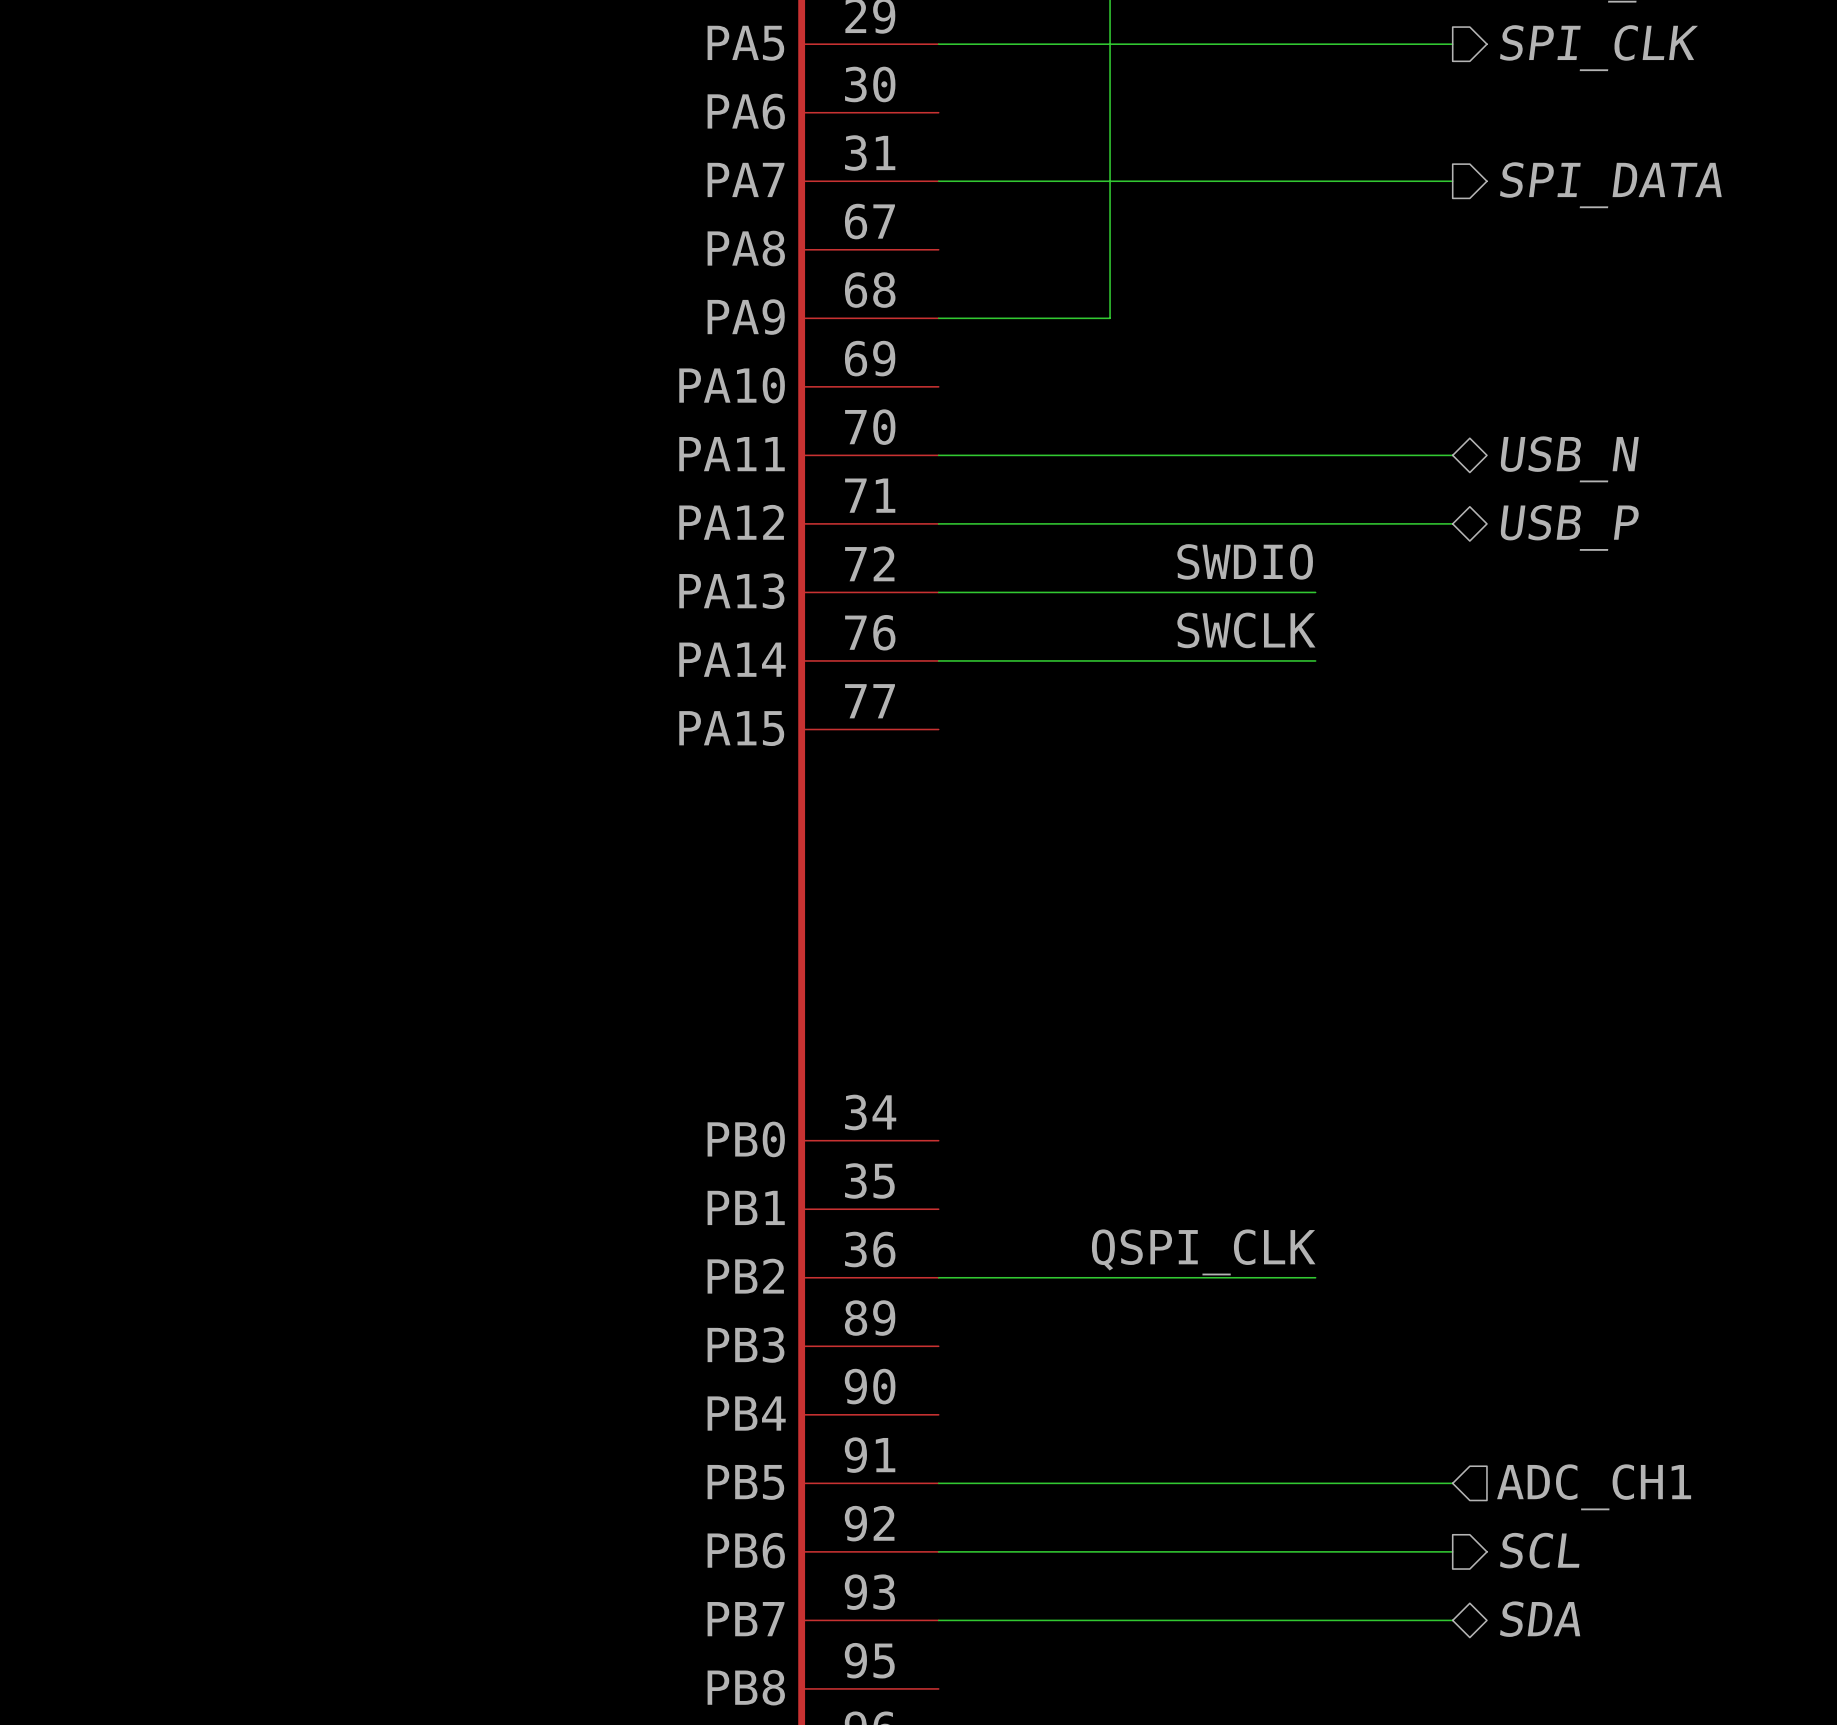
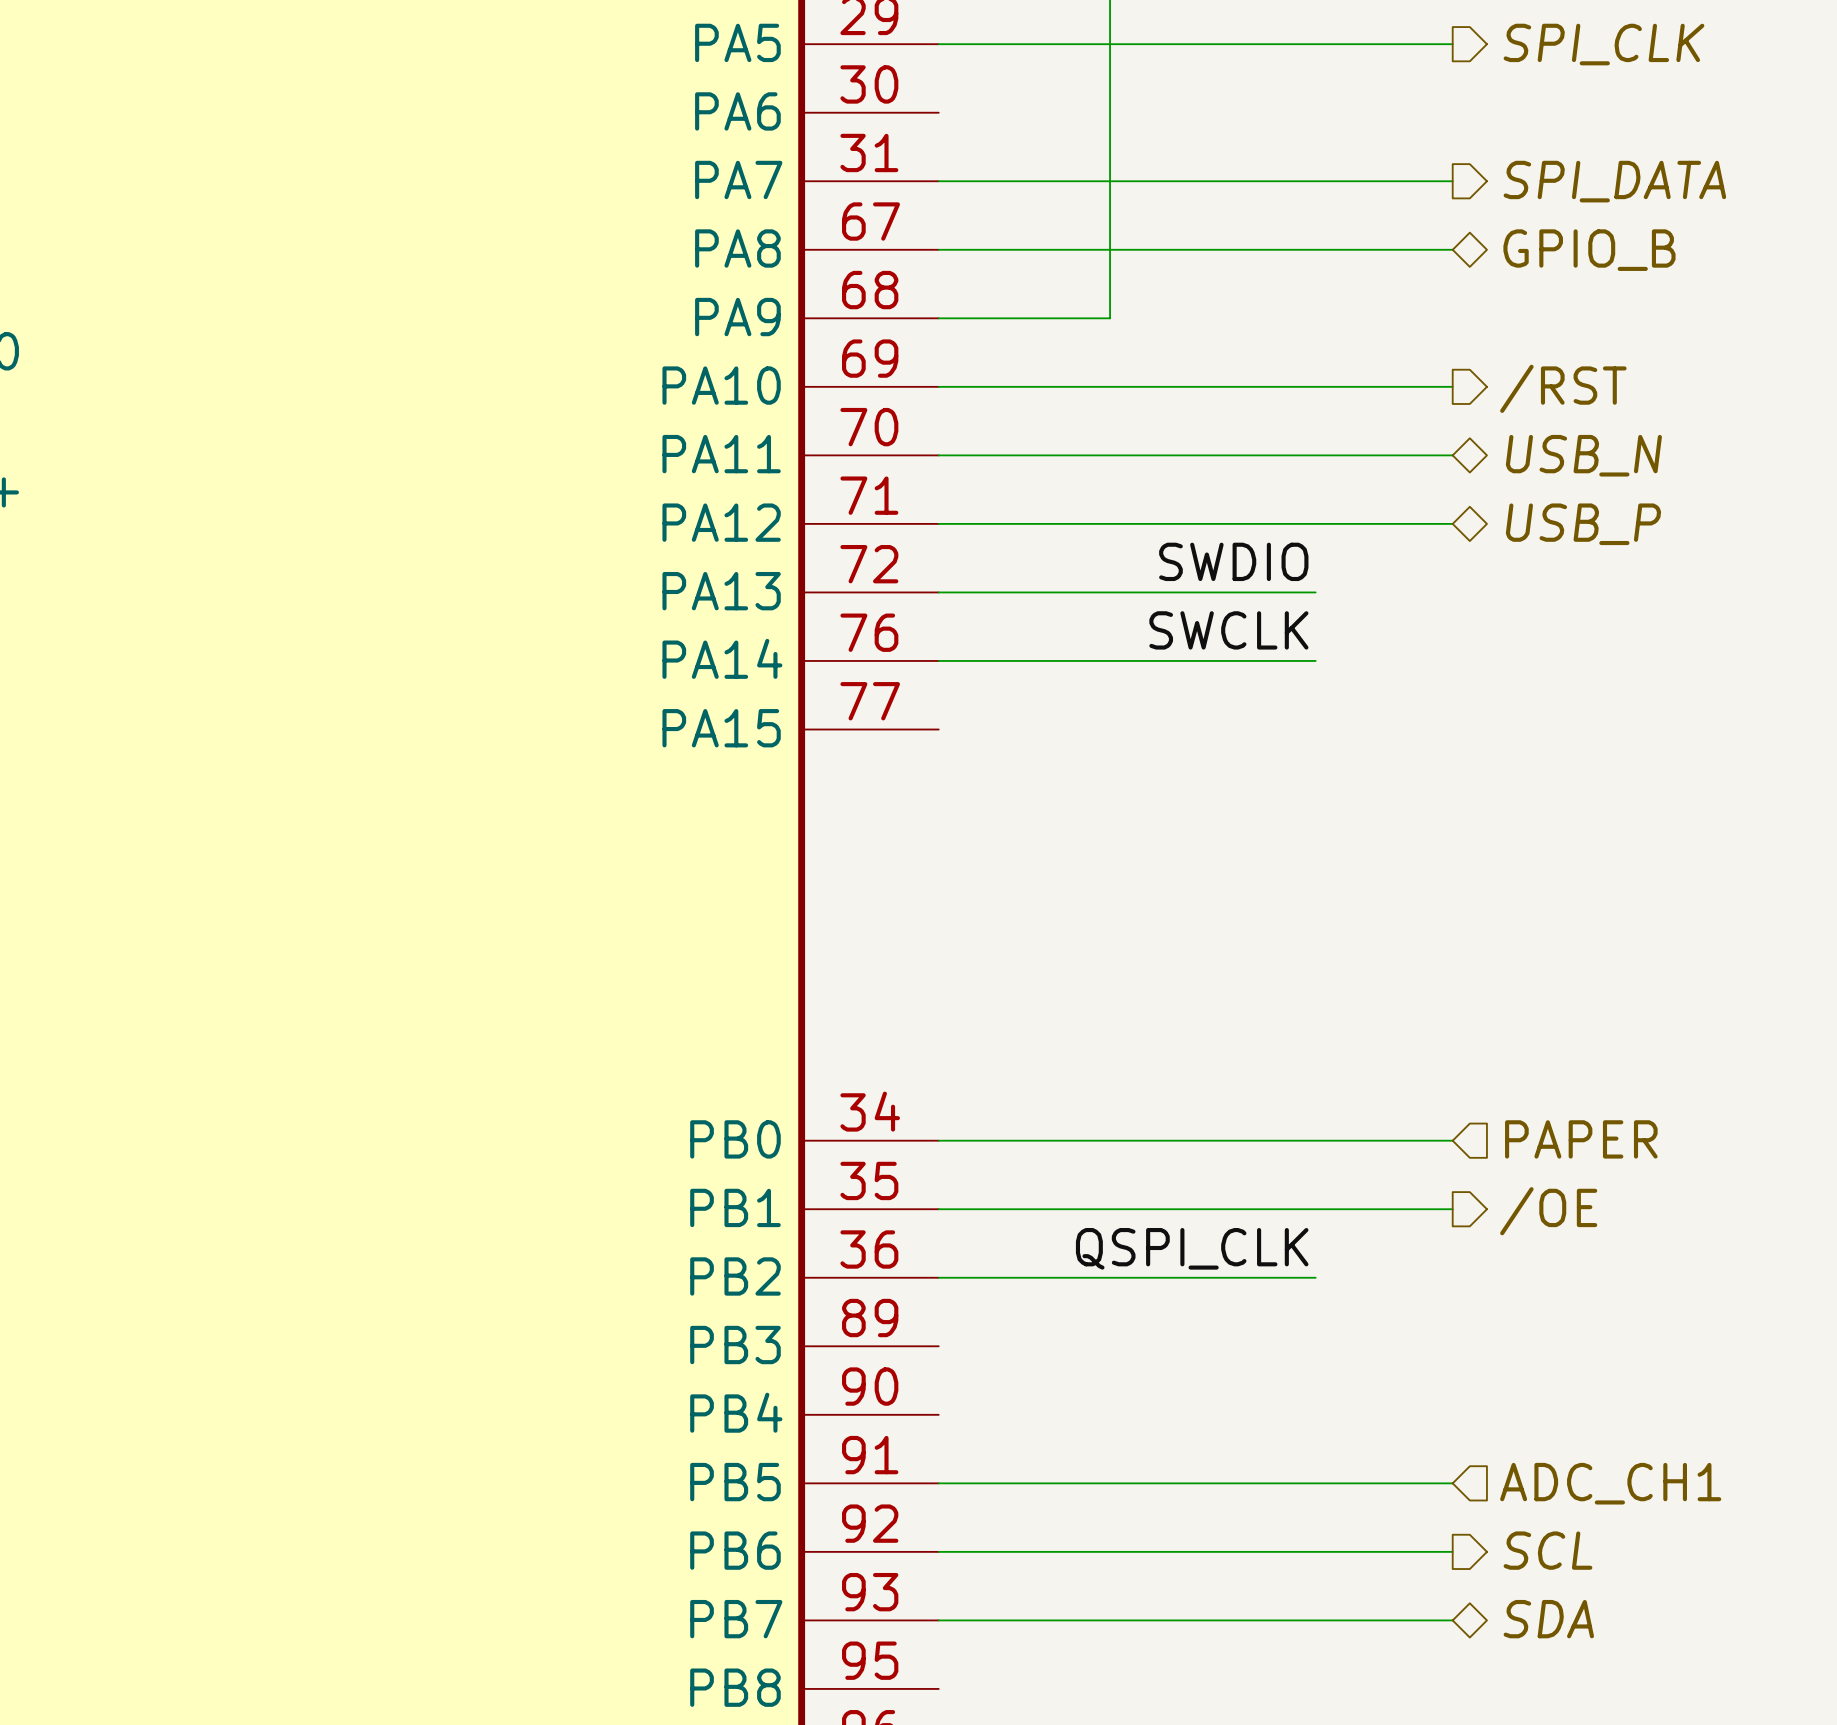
wire: none -> (938, 249) (1452, 249)
hierarchical label: none -> GPIO_B (1589, 250)
wire: none -> (938, 386) (1452, 386)
hierarchical label: none -> /RST (1563, 388)
hierarchical label: none -> PAPER (1581, 1139)
wire: none -> (938, 1140) (1452, 1140)
wire: none -> (938, 1209) (1452, 1209)
hierarchical label: none -> /OE (1548, 1211)

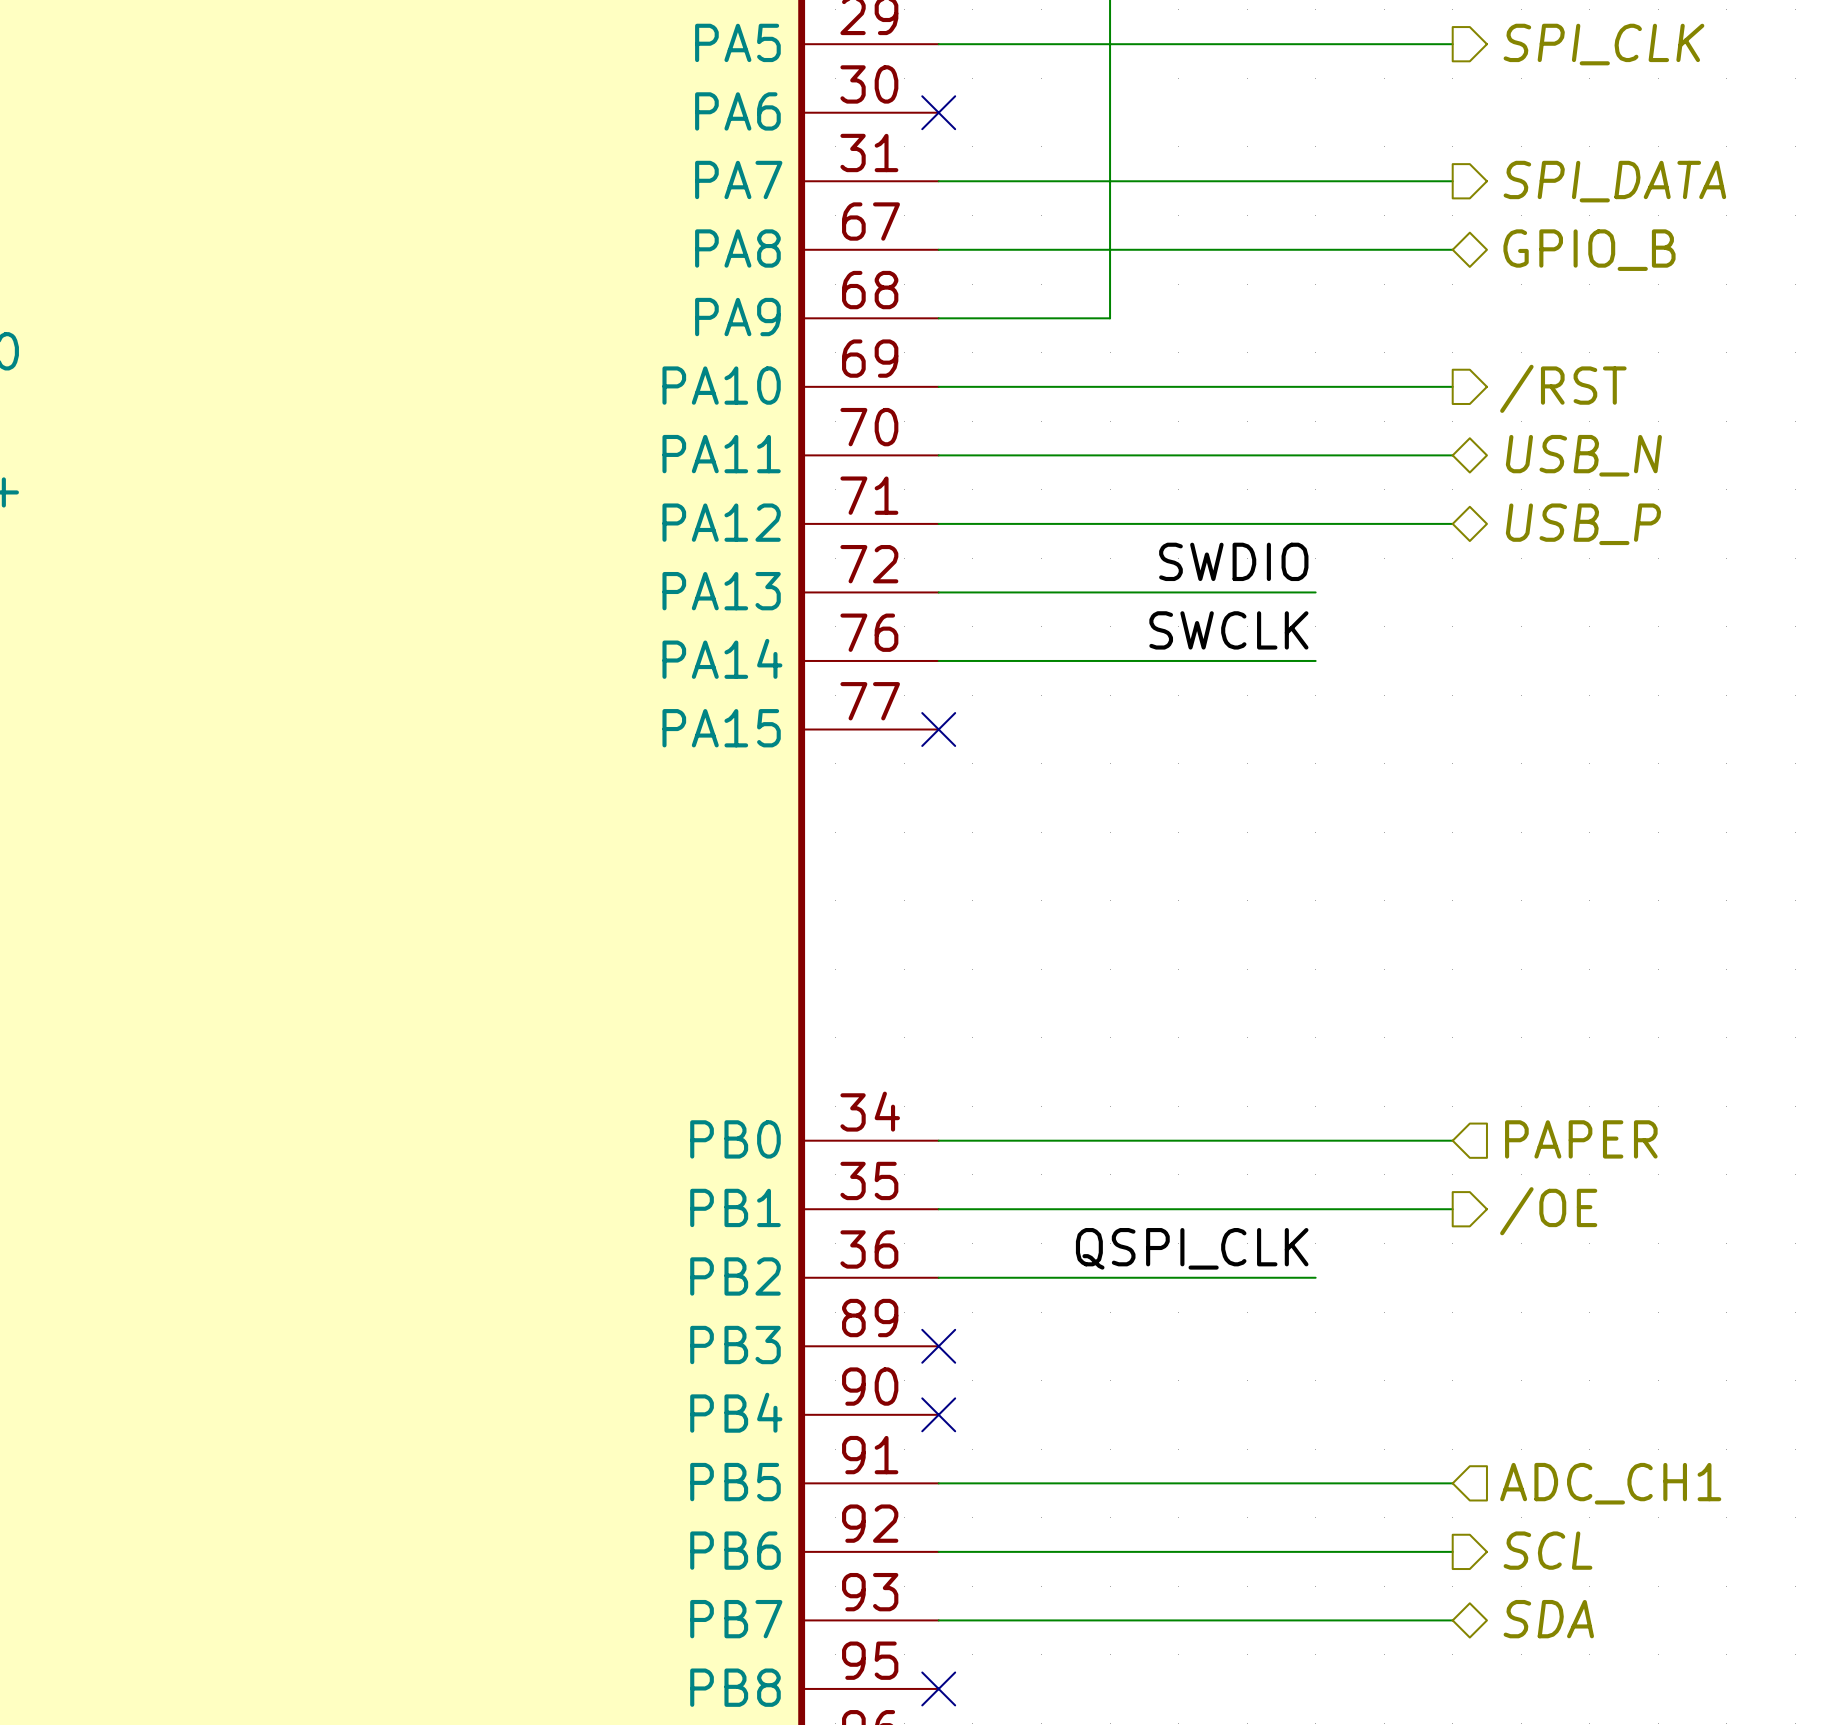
no-connect mark: none -> (938, 112)
no-connect mark: none -> (938, 729)
no-connect mark: none -> (938, 1346)
no-connect mark: none -> (938, 1414)
no-connect mark: none -> (938, 1688)

